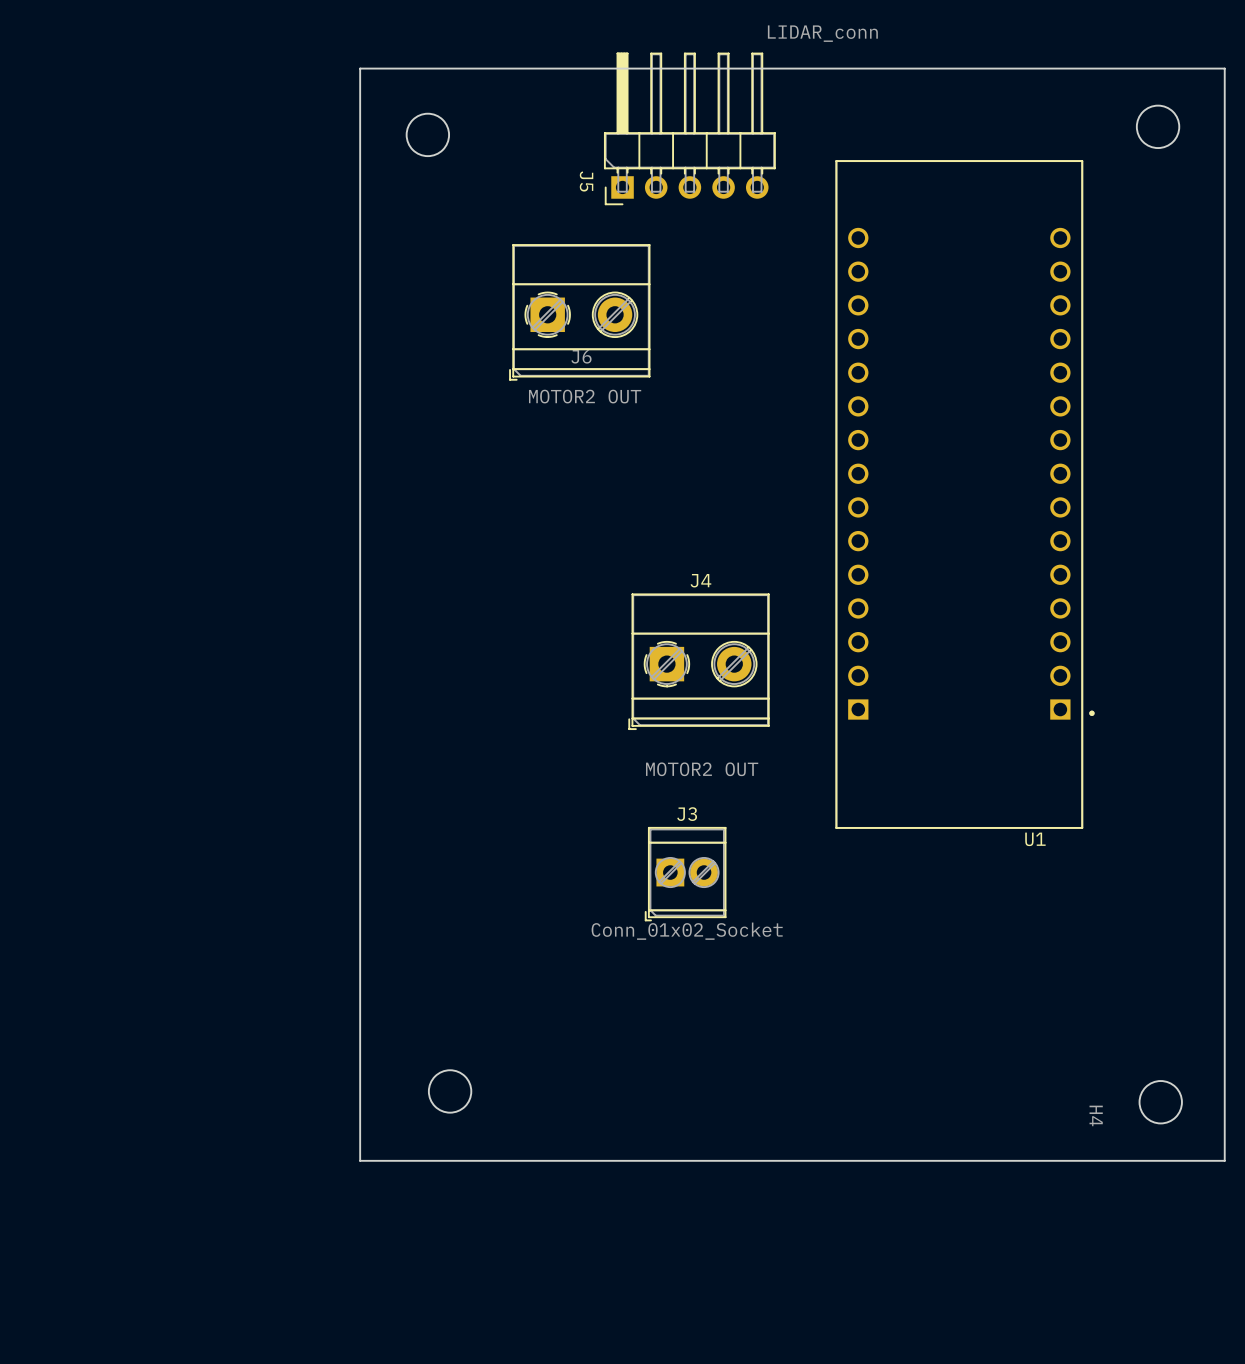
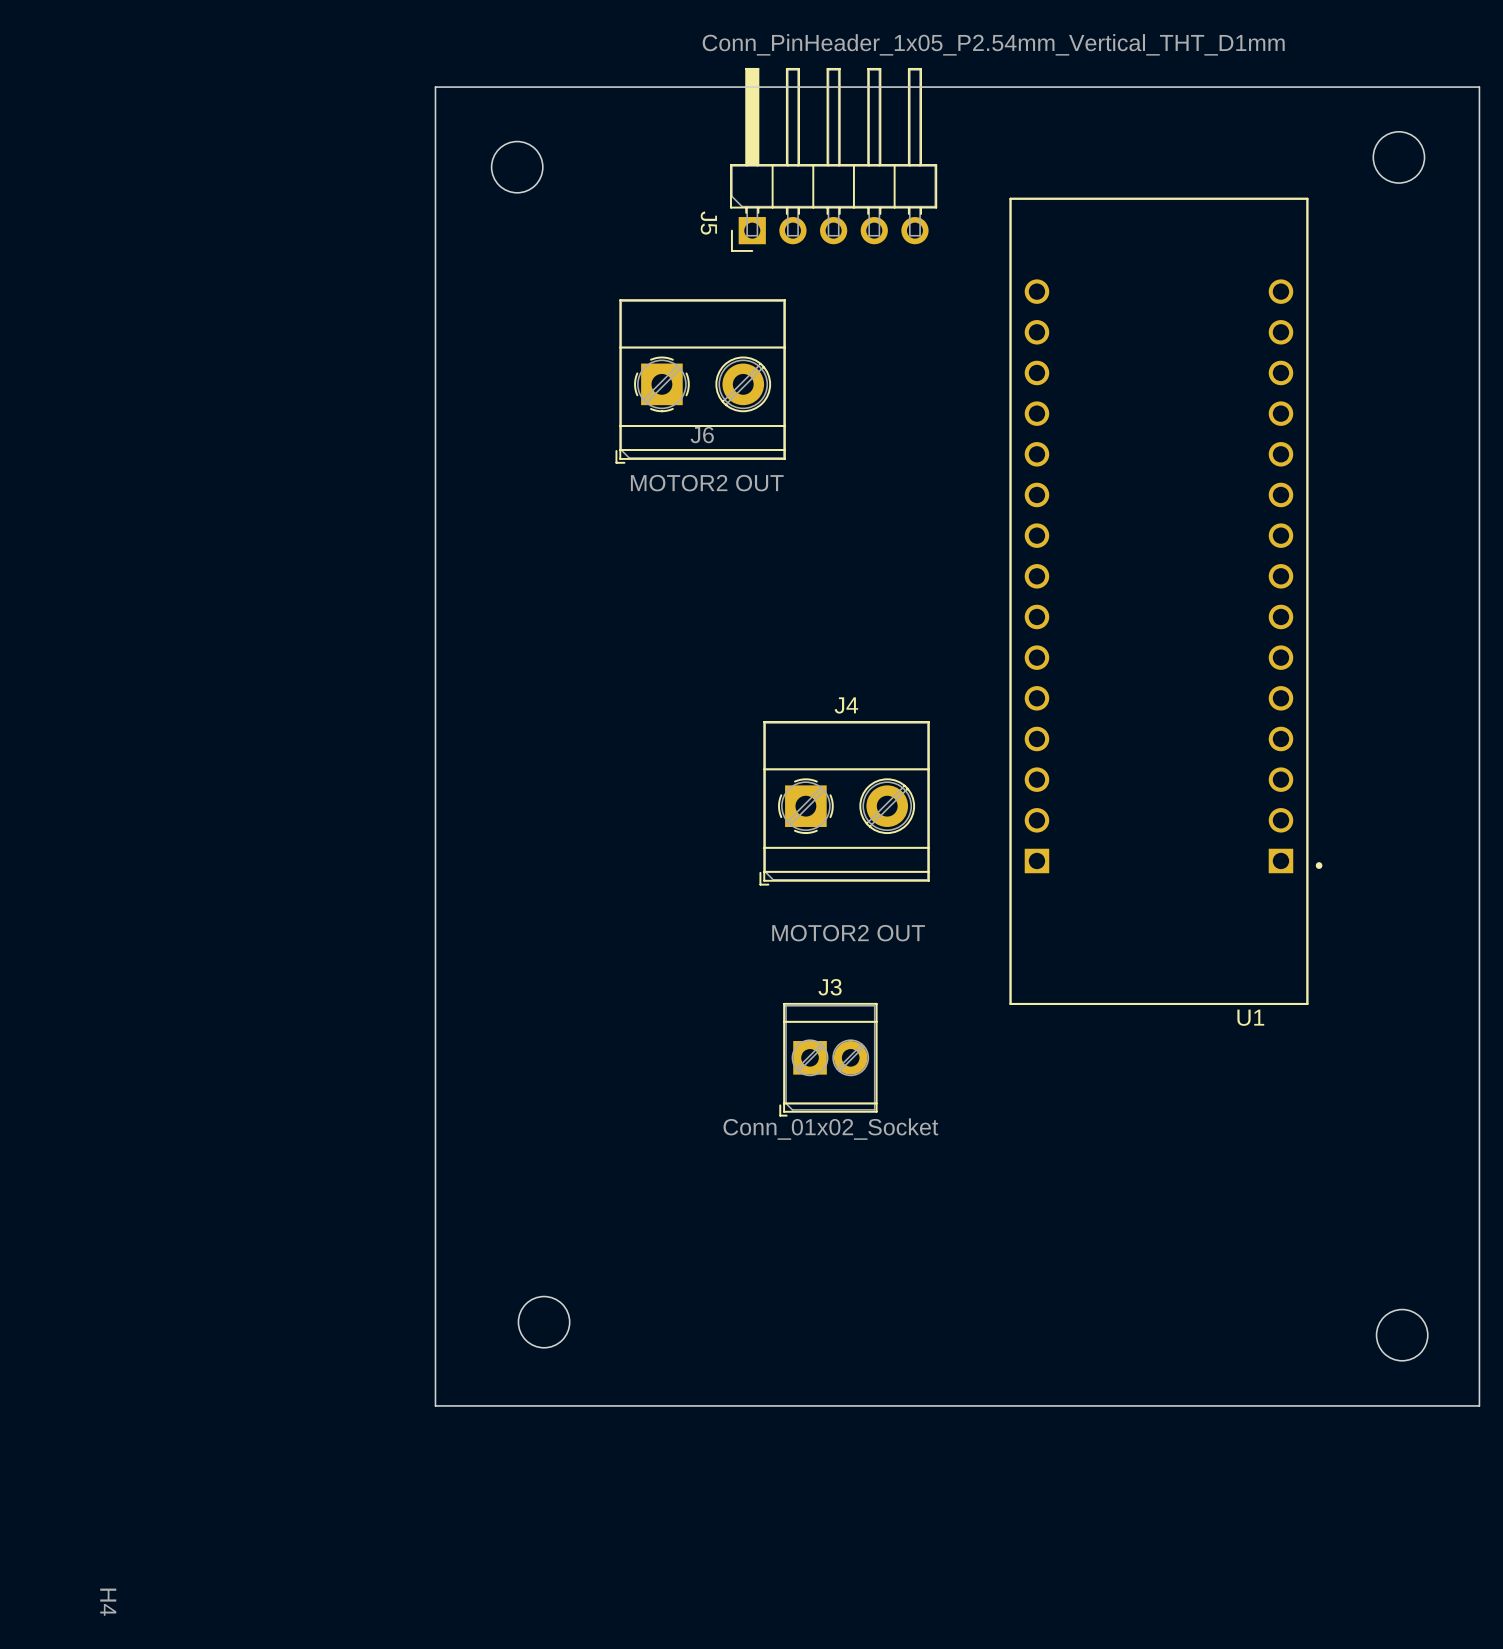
J5 value: LIDAR_conn (822, 33) -> Conn_PinHeader_1x05_P2.54mm_Vertical_THT_D1mm (993, 44)
H4 name position: H4 (1096, 1115) -> H4 (108, 1602)

